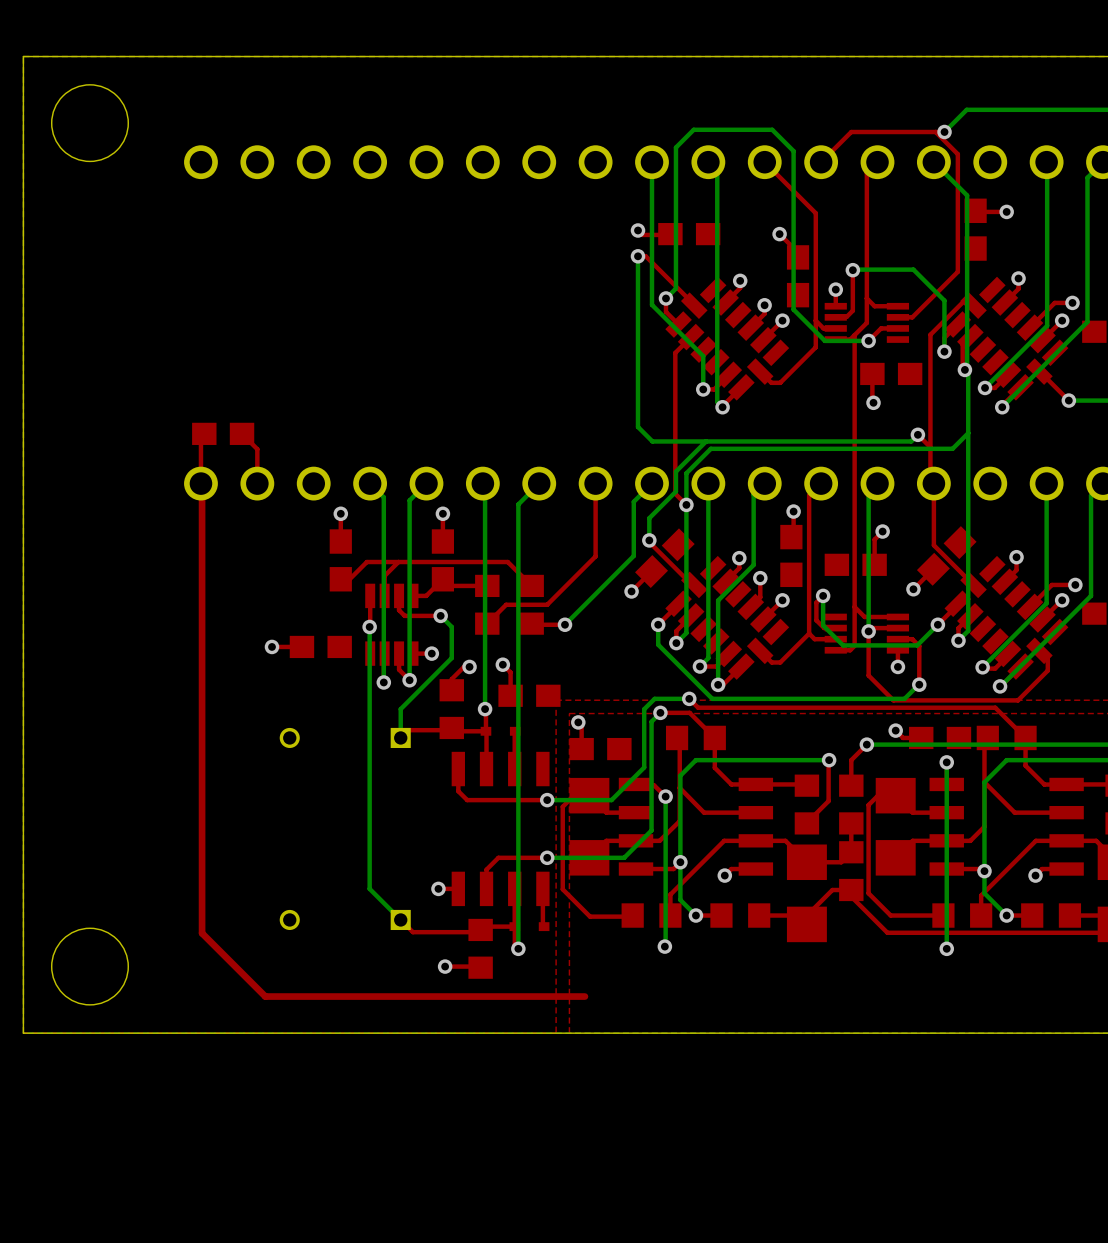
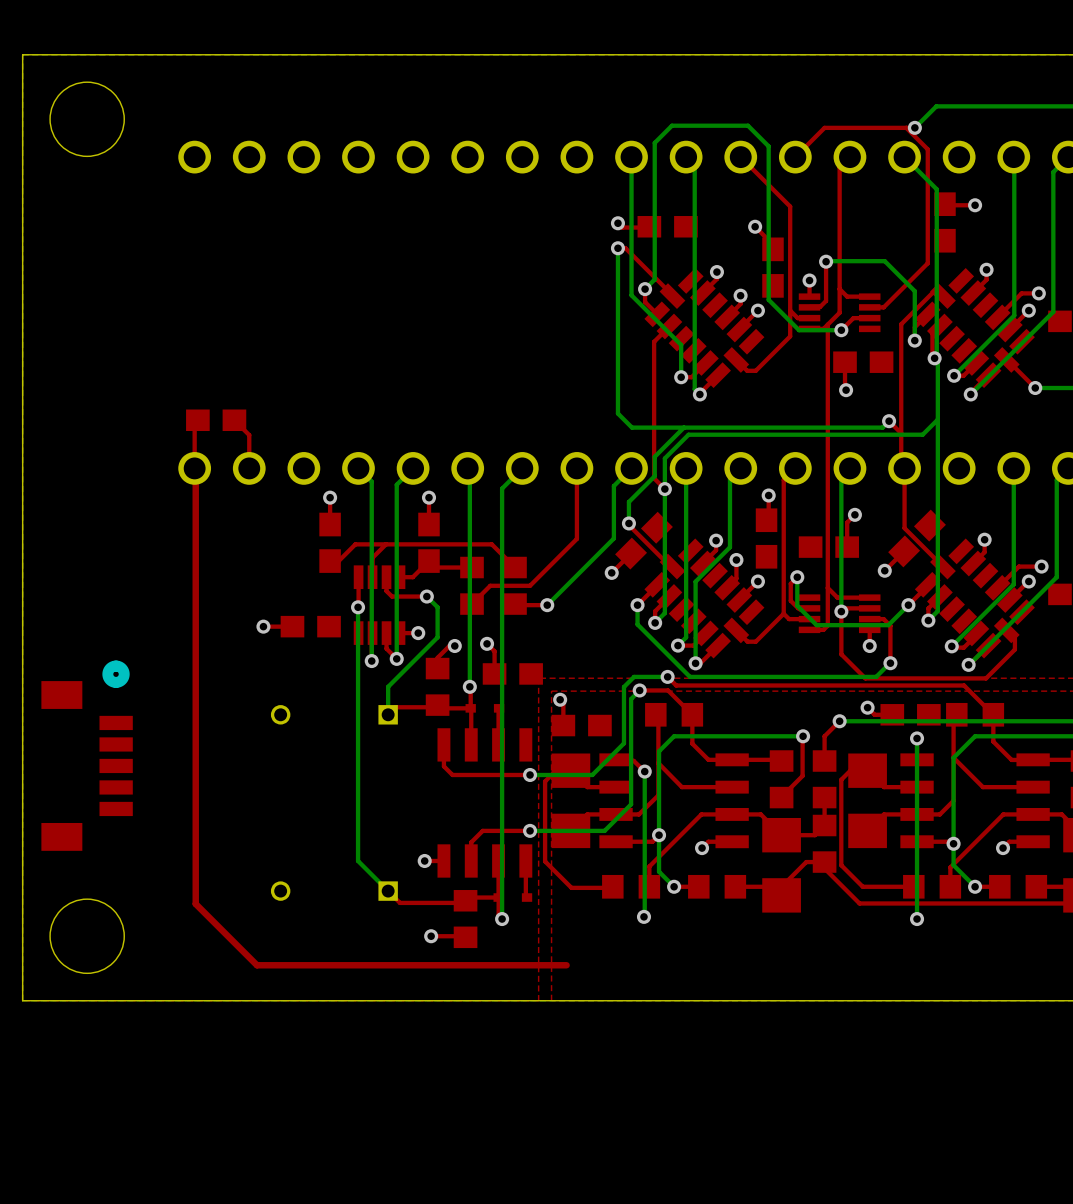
part: none -> (87, 755)

